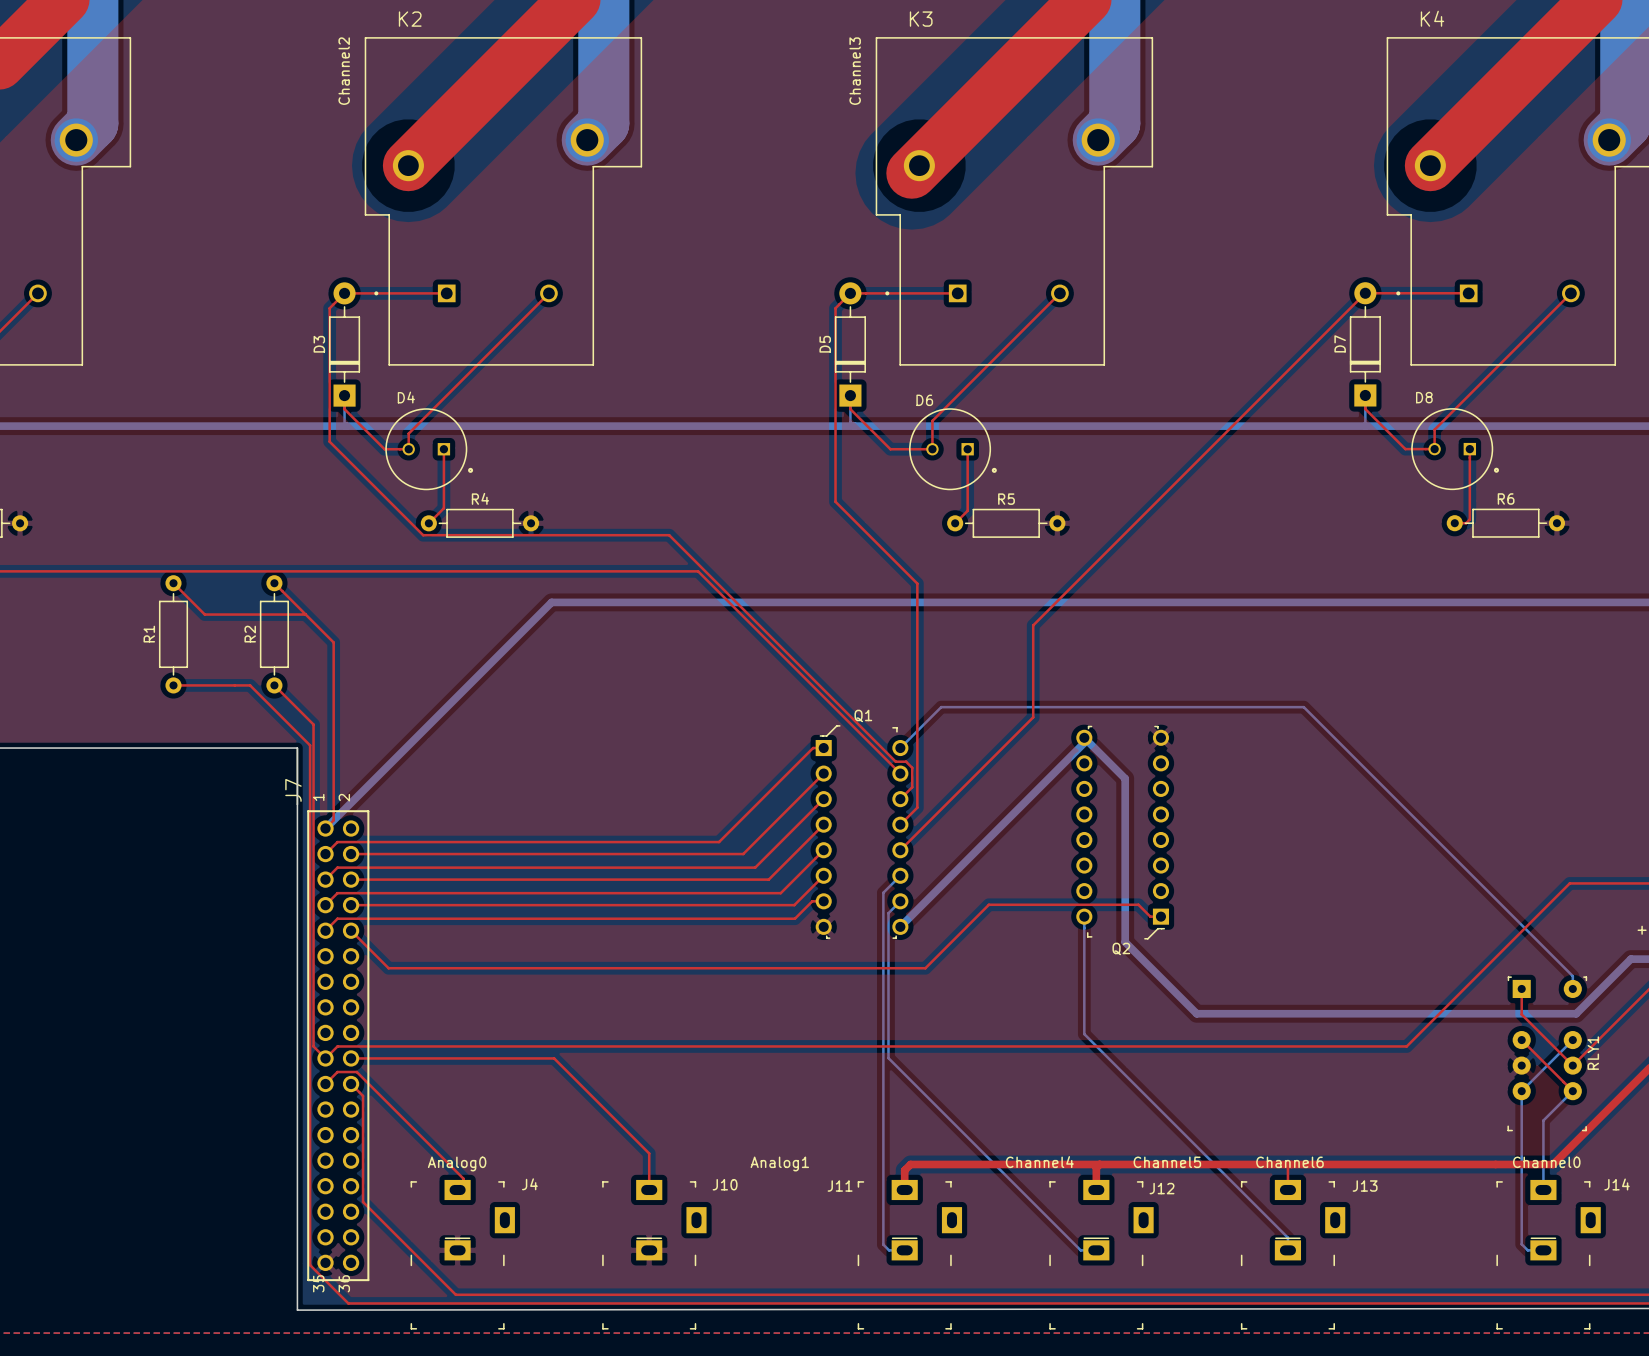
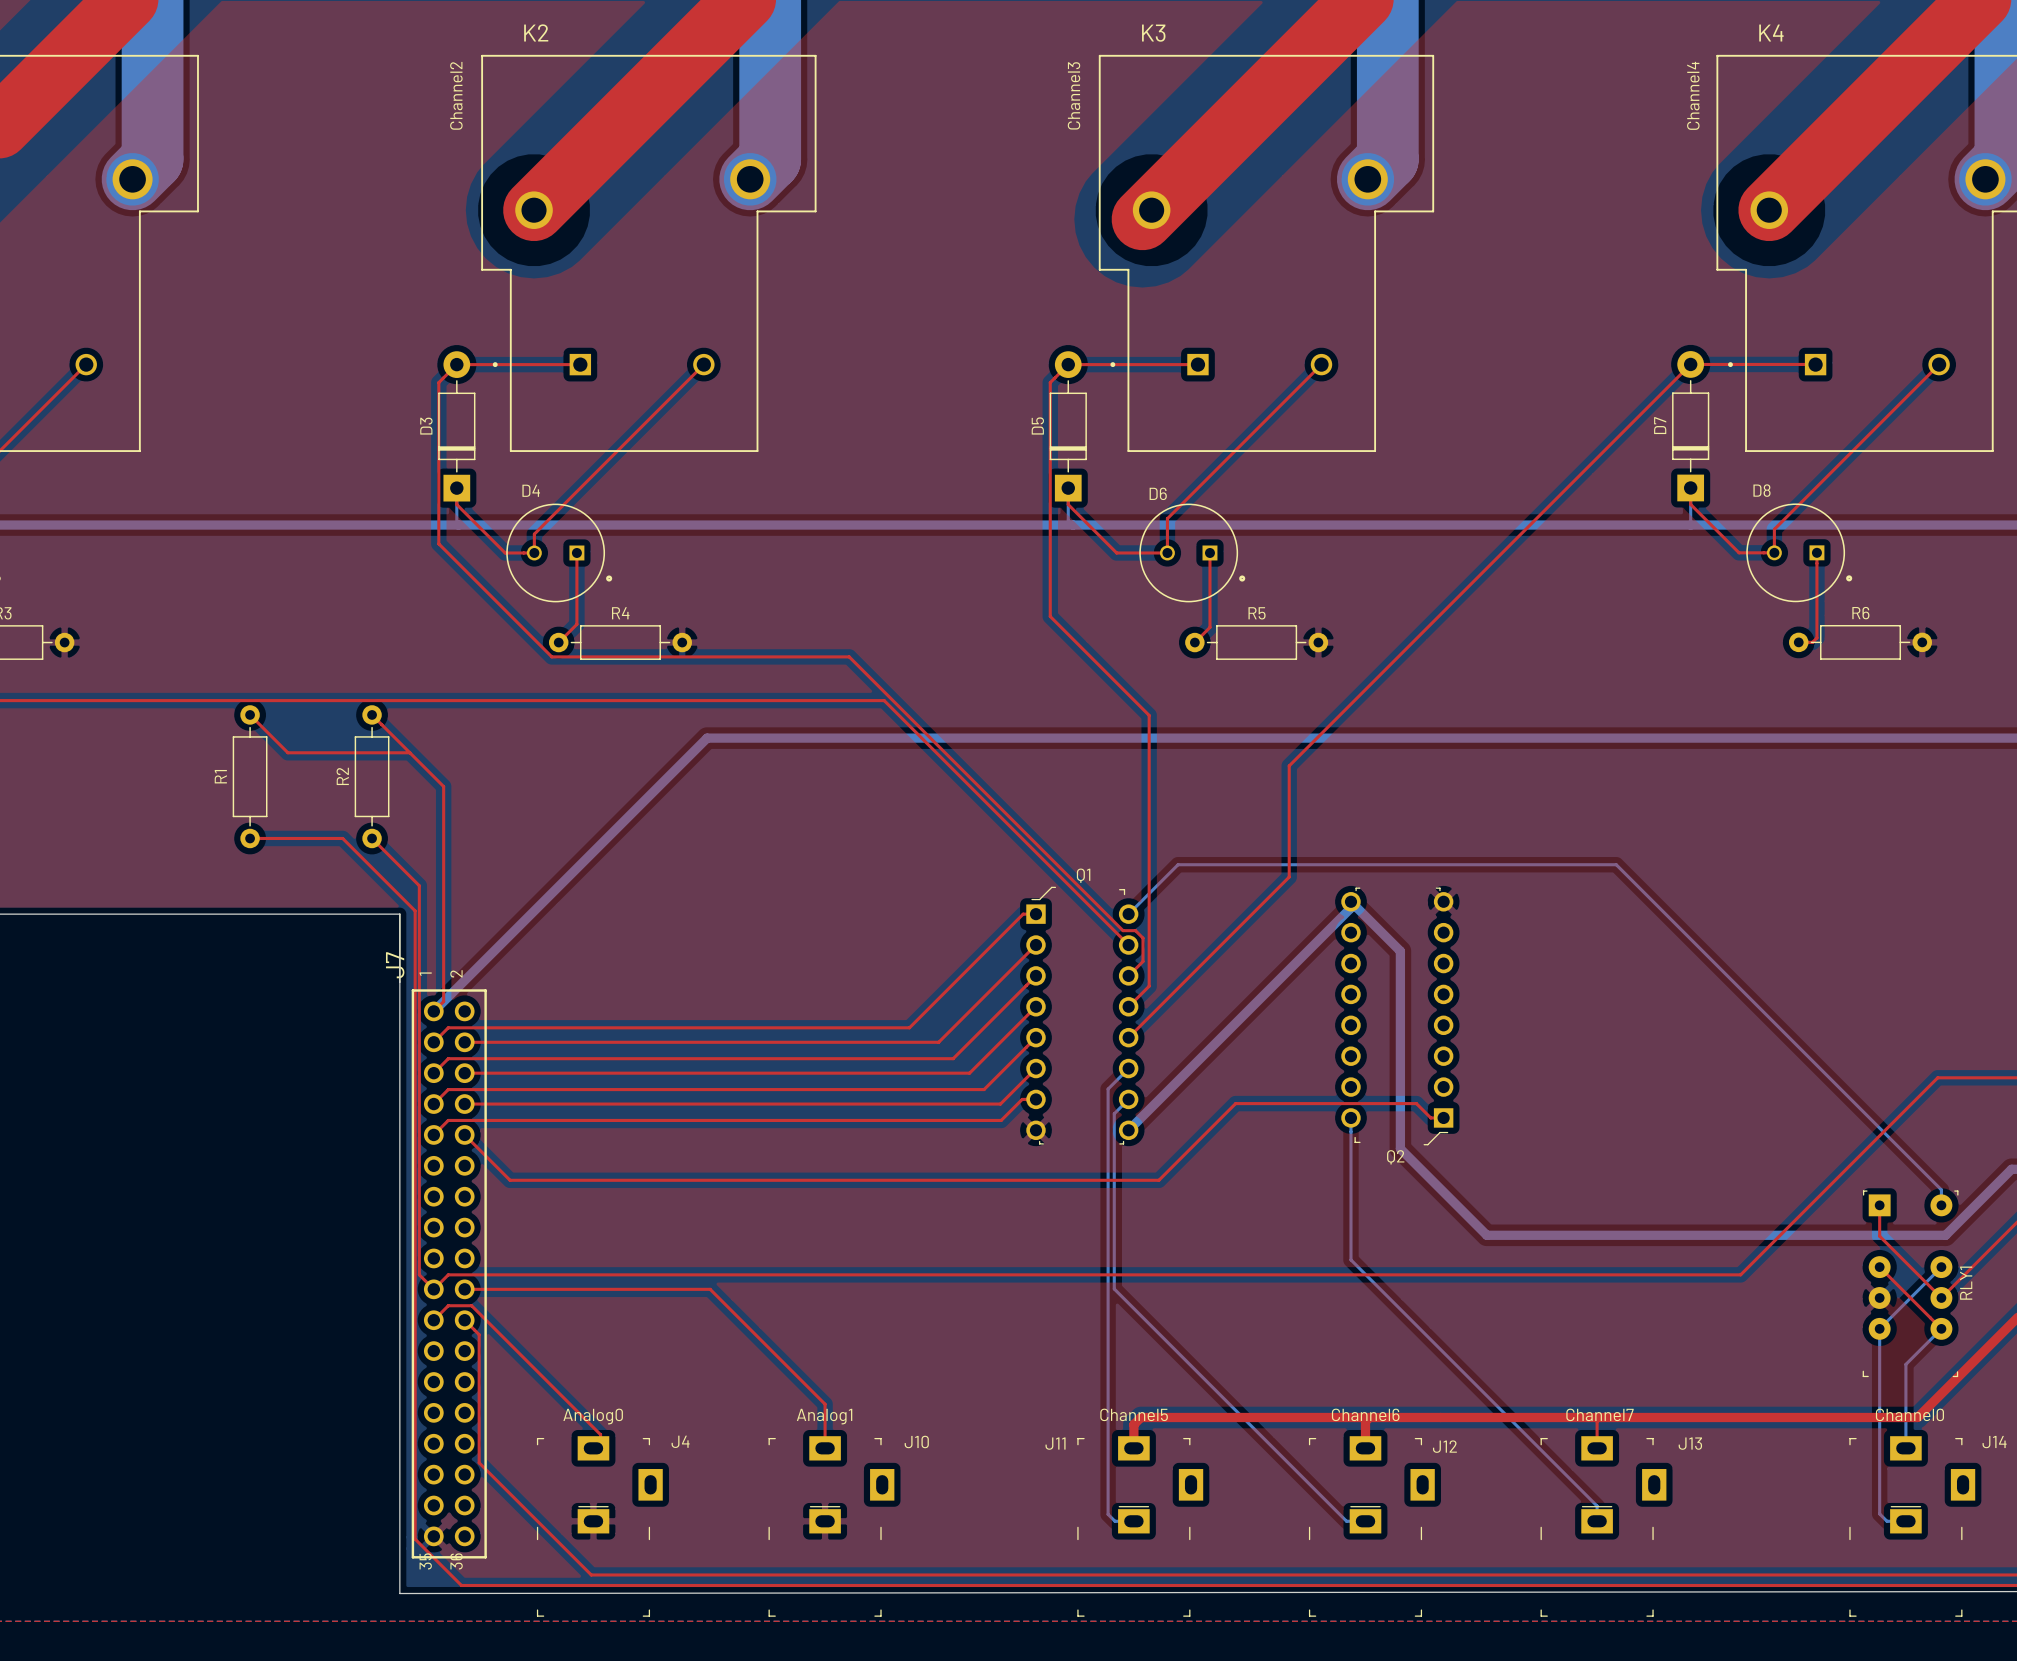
text: none -> Channel4 (1693, 95)
text: none -> Channel5 (1134, 1414)
text: Channel4 (1039, 1162) -> none
text: none -> Channel6 (1365, 1414)
text: Channel5 (1167, 1162) -> none
text: Channel6 (1289, 1162) -> Channel7 (1600, 1414)
text position: Analog1 (779, 1163) -> Analog1 (824, 1416)

